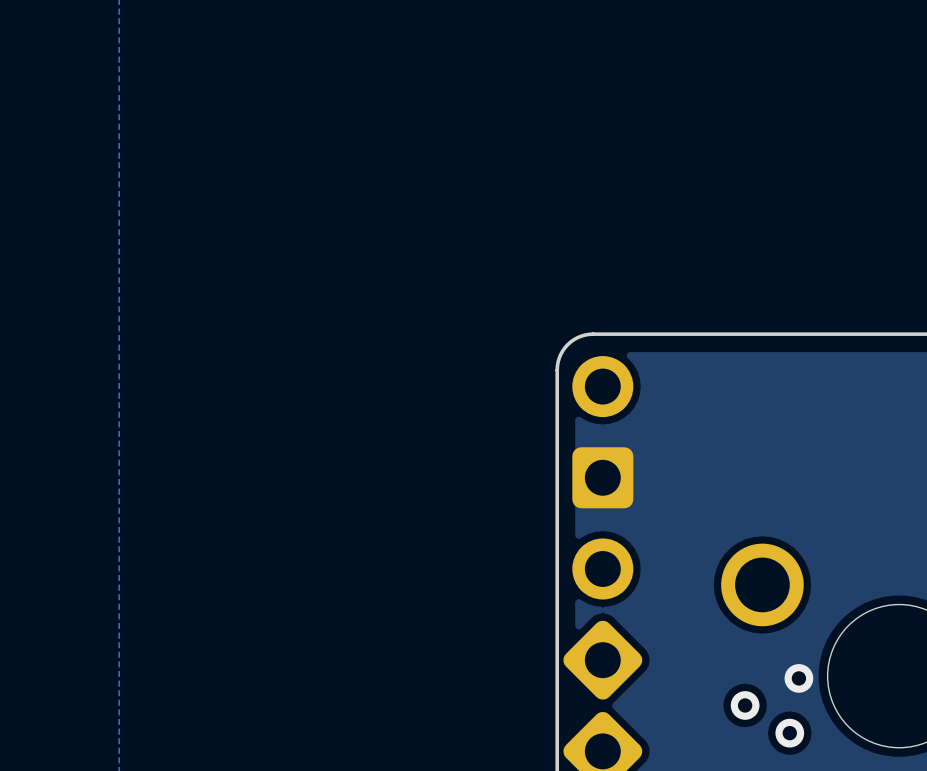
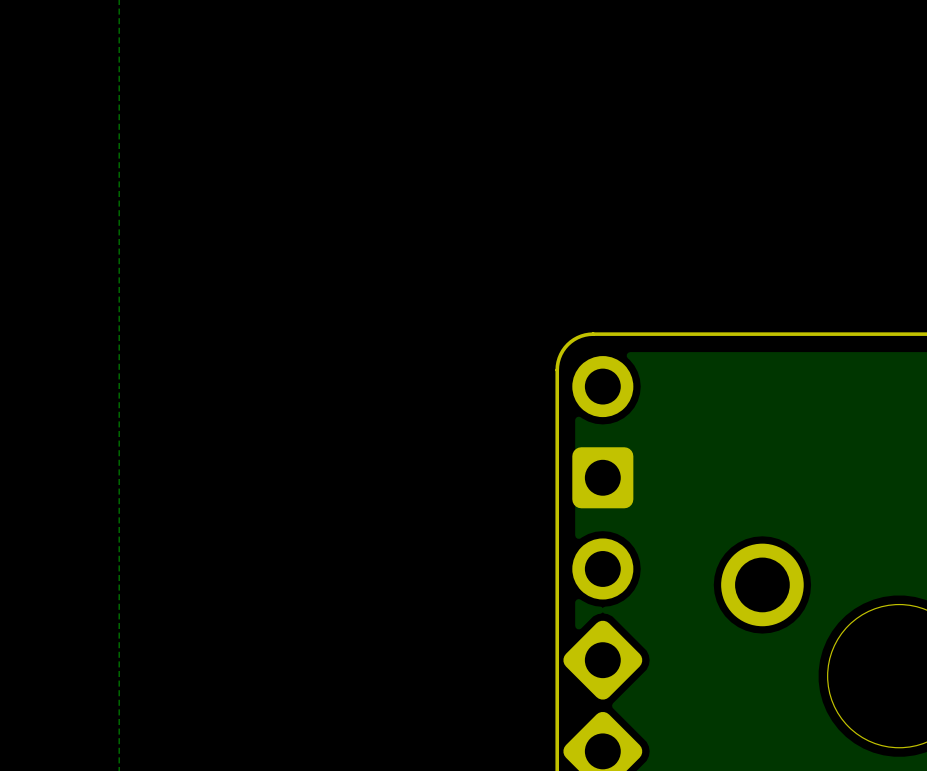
via: (798, 678) -> none
via: (745, 705) -> none
via: (789, 733) -> none

